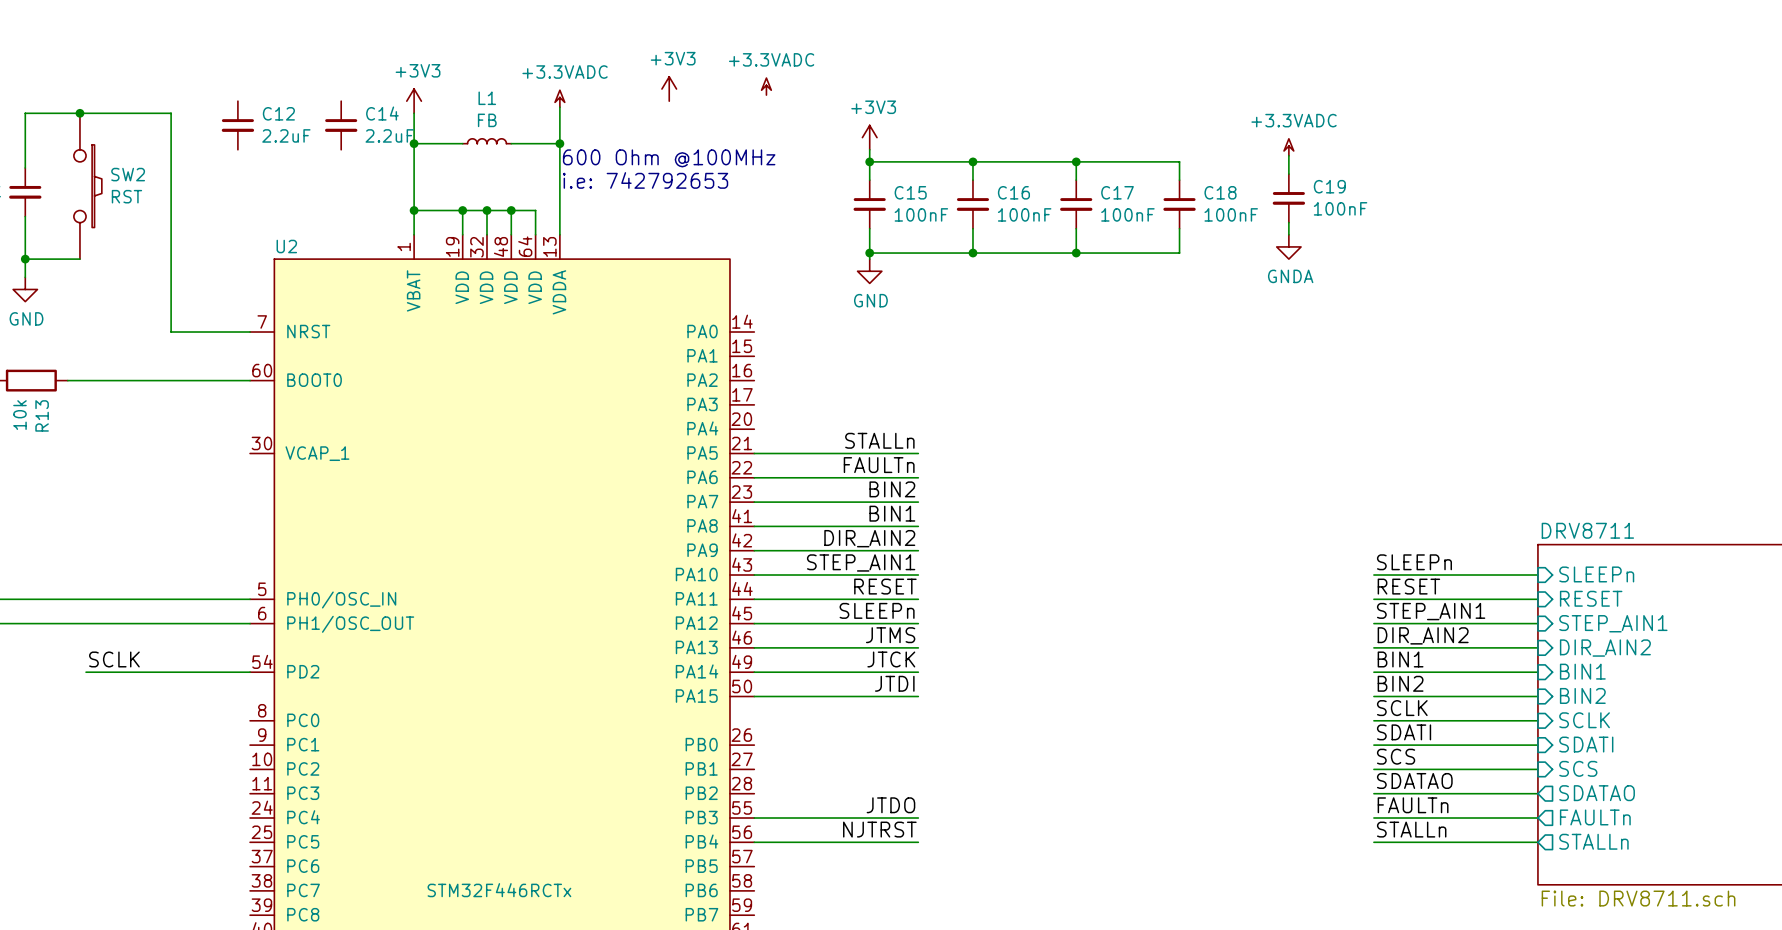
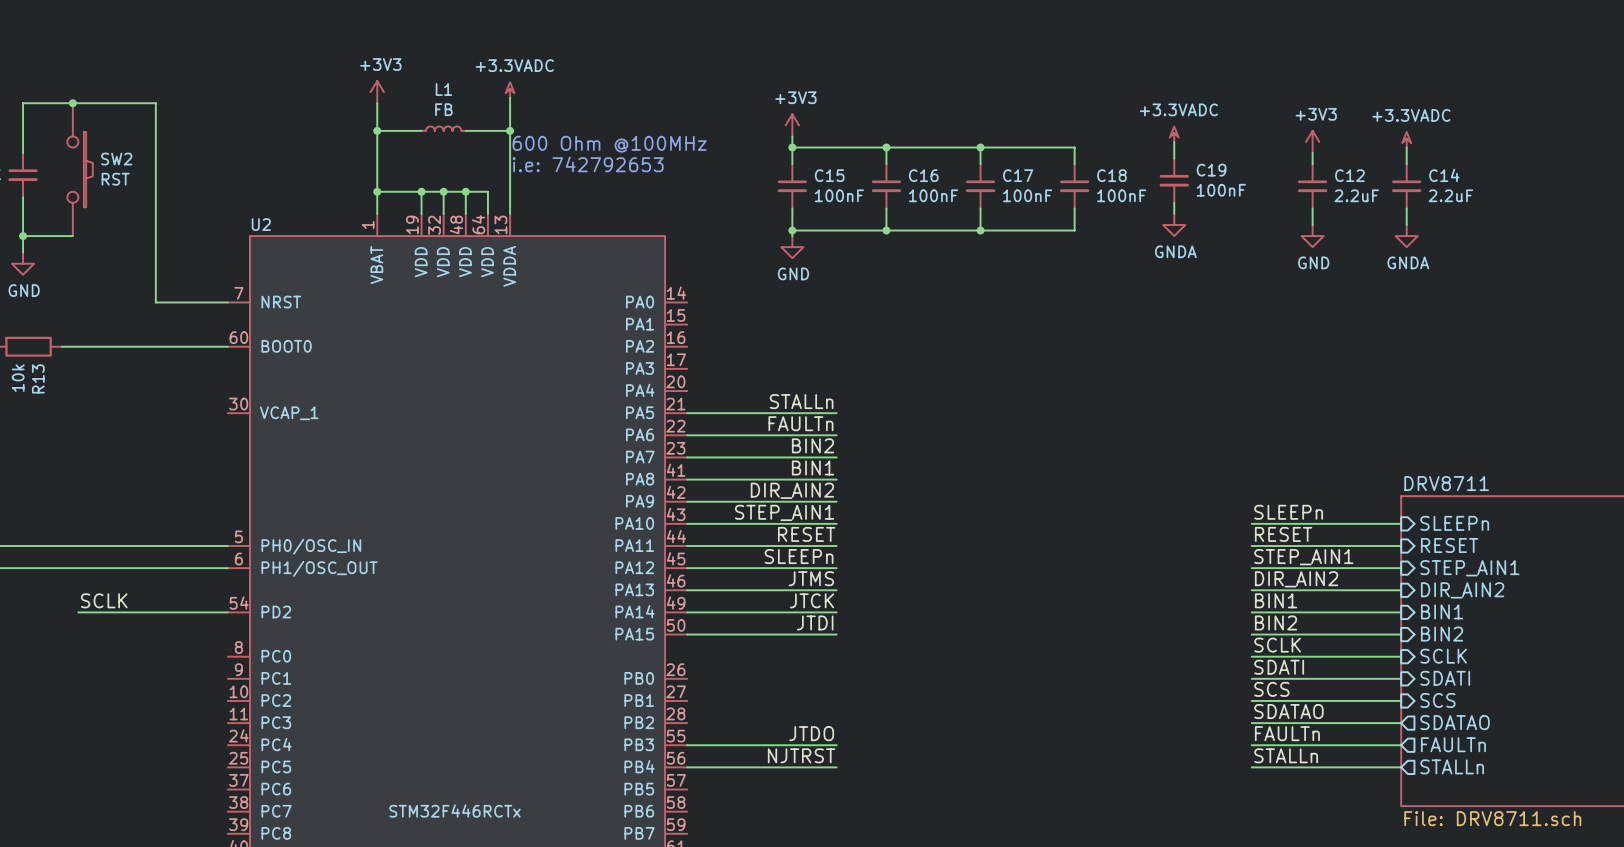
power symbol: +3.3VADC (766, 86) -> none
power symbol: +3V3 (669, 89) -> none
C12 position: (237, 125) -> (1312, 186)
C14 position: (341, 125) -> (1406, 186)
power symbol: none -> +3.3VADC (1406, 139)
power symbol: none -> +3V3 (1312, 141)
wire: none -> (1406, 147) (1406, 164)
wire: none -> (1312, 153) (1312, 164)
wire: none -> (1312, 208) (1312, 224)
wire: none -> (1406, 208) (1406, 224)
power symbol: none -> GND (1312, 236)
power symbol: none -> GNDA (1406, 236)

